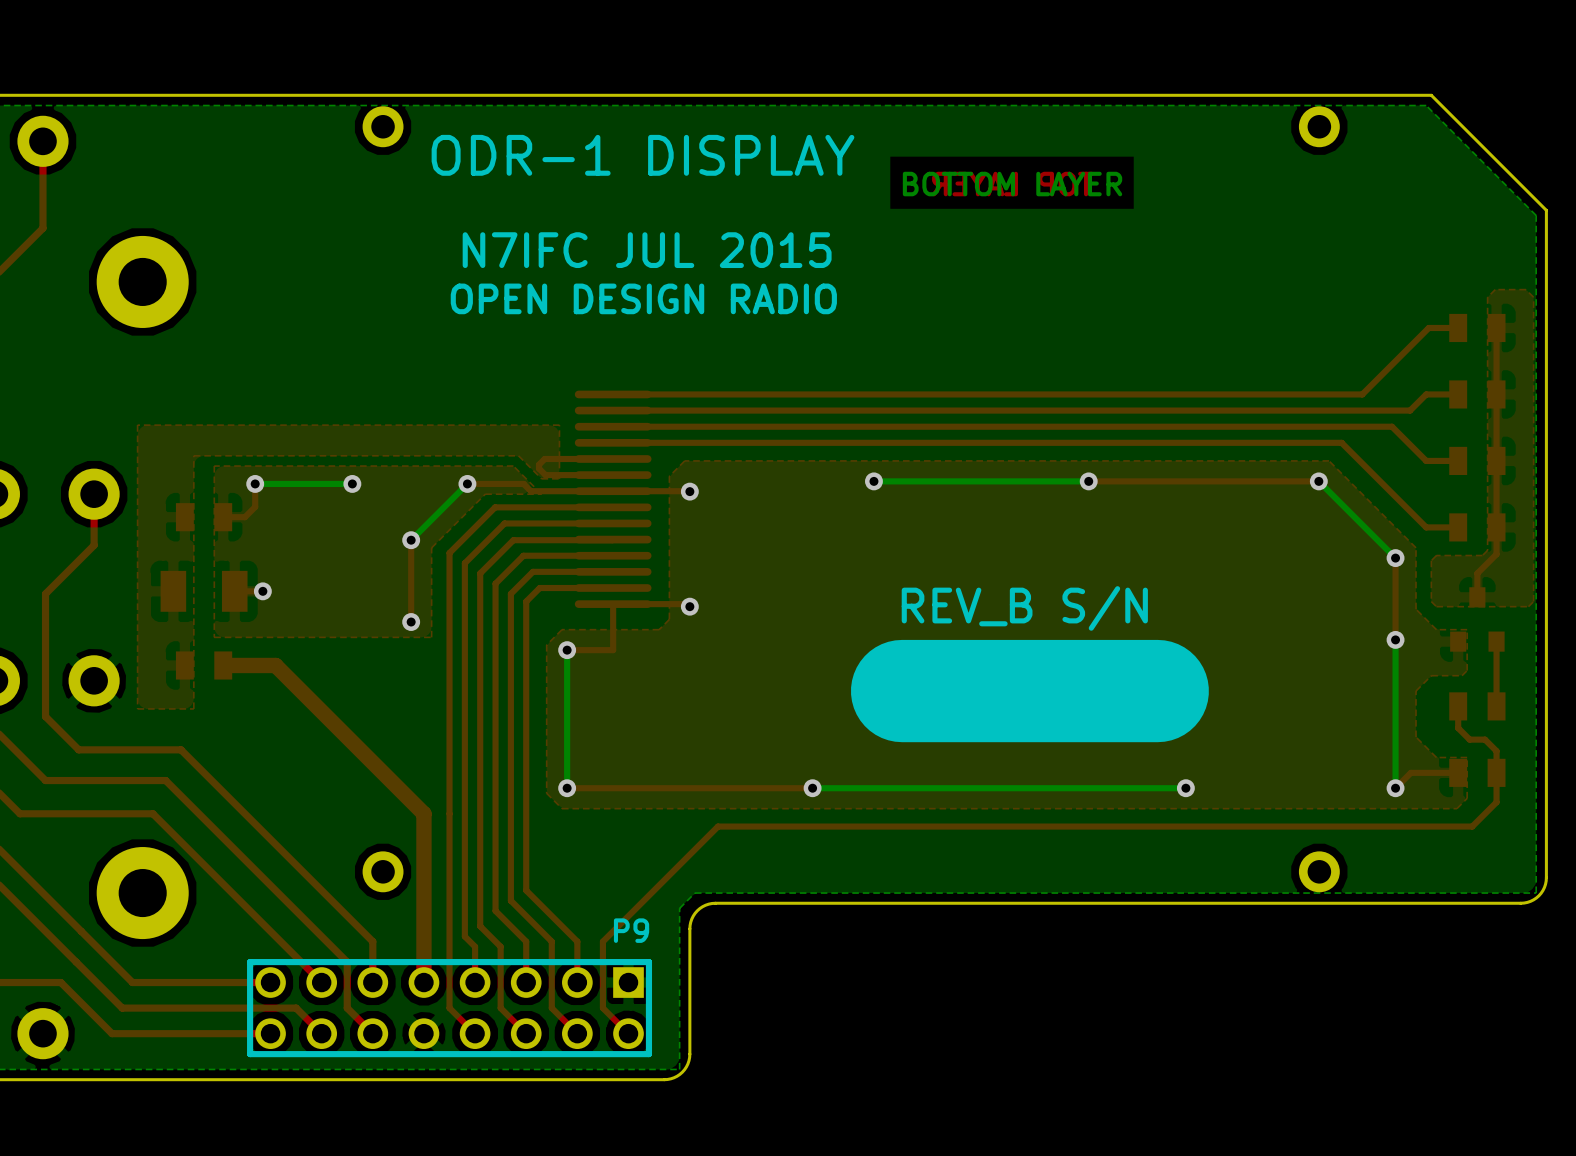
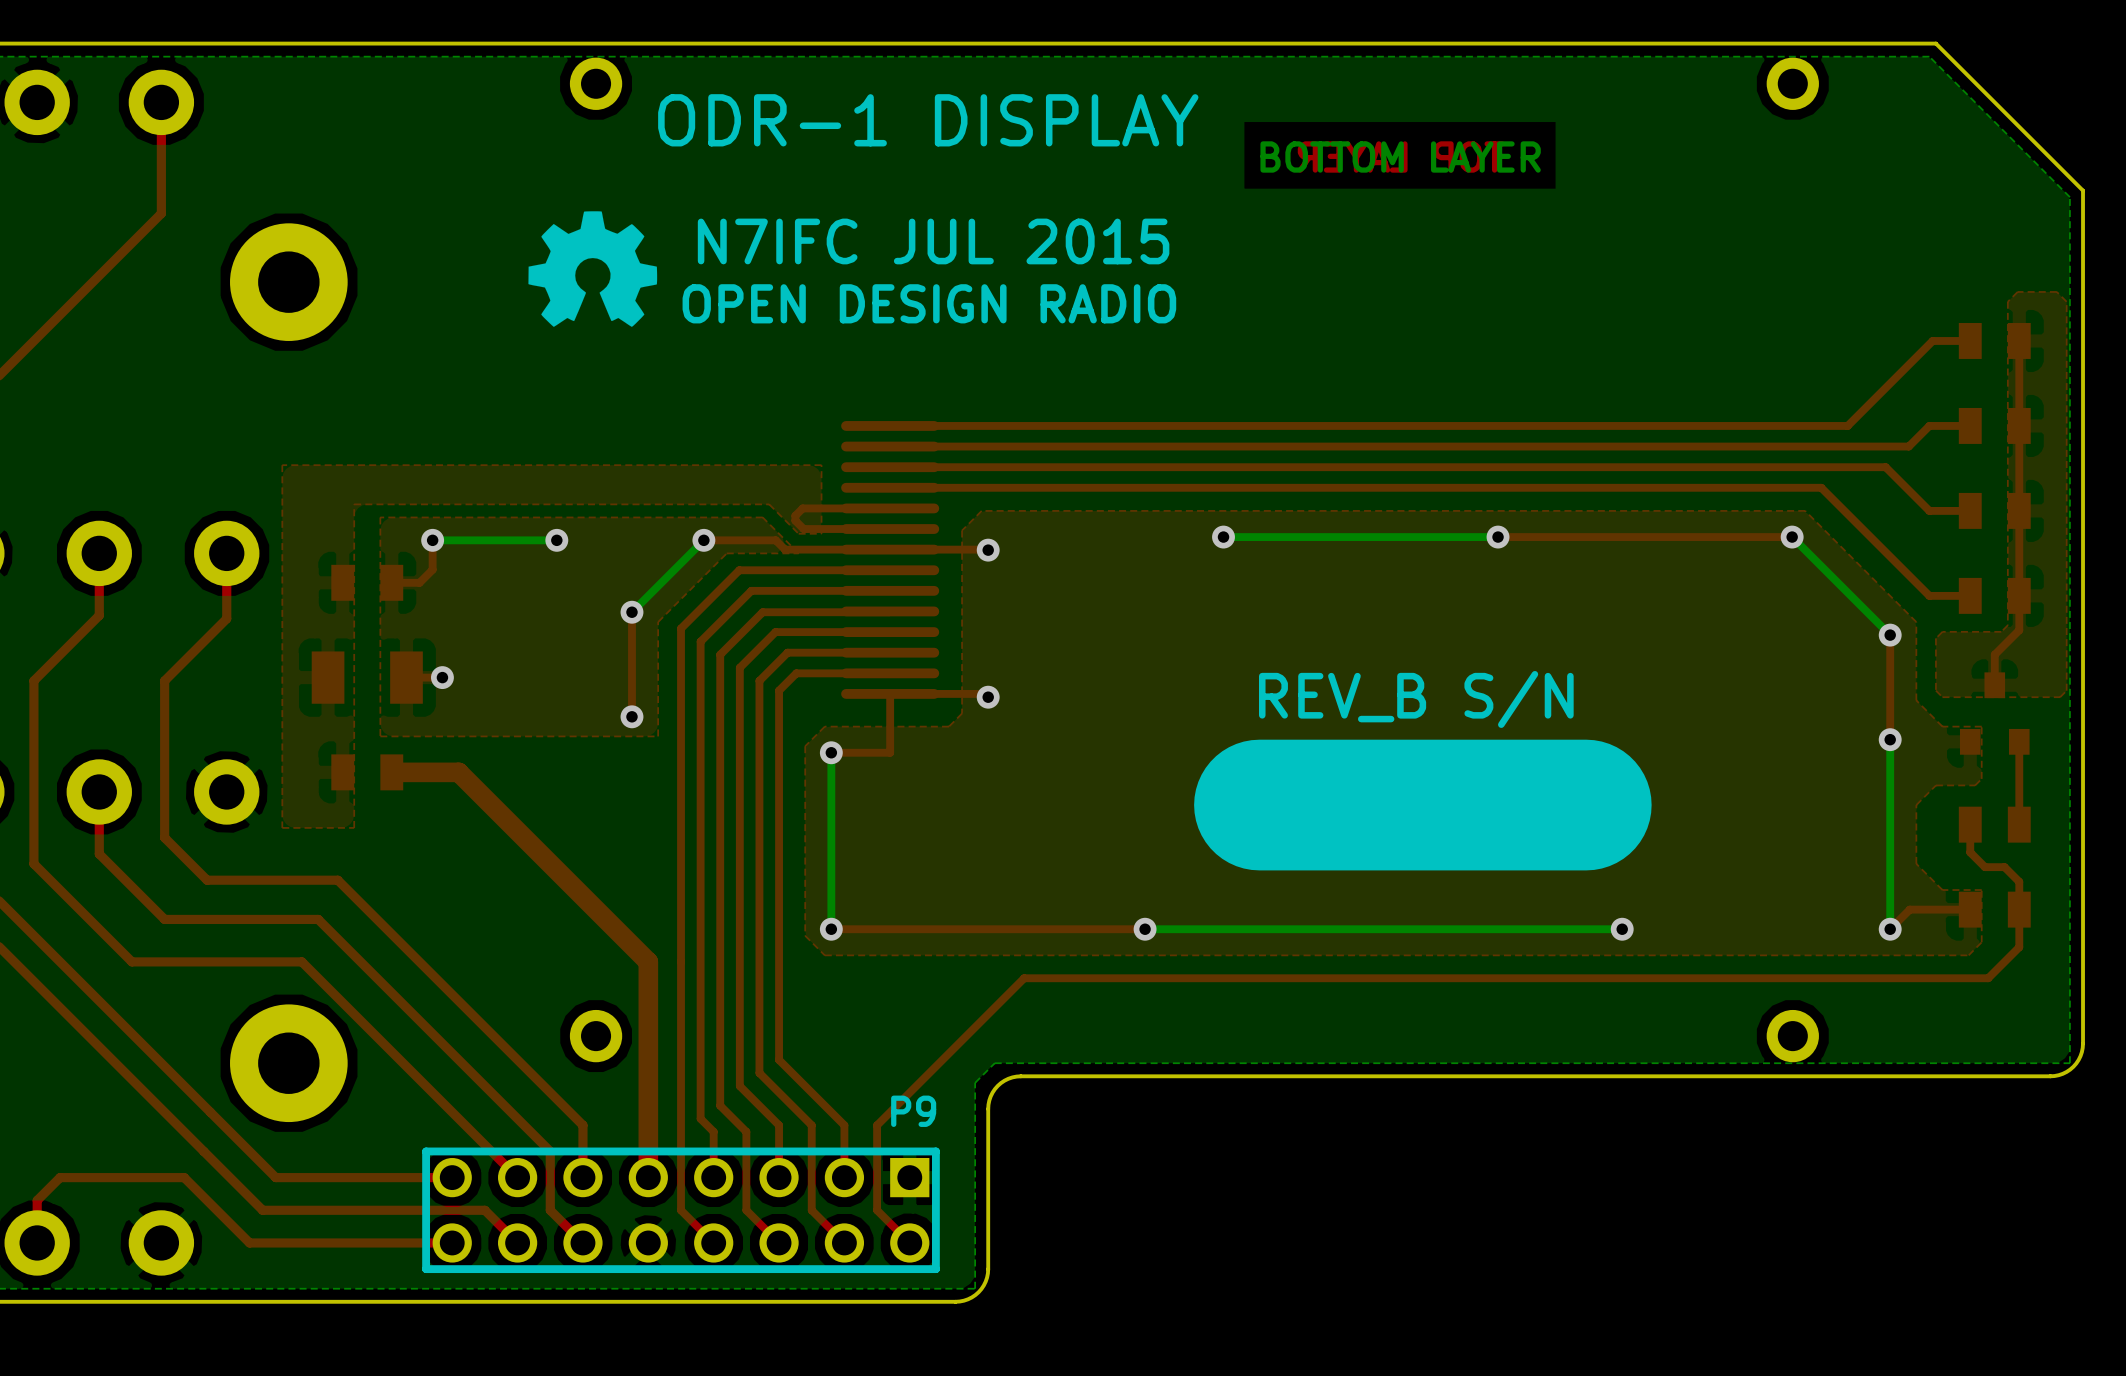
drawing: none -> [528, 211, 658, 327]

